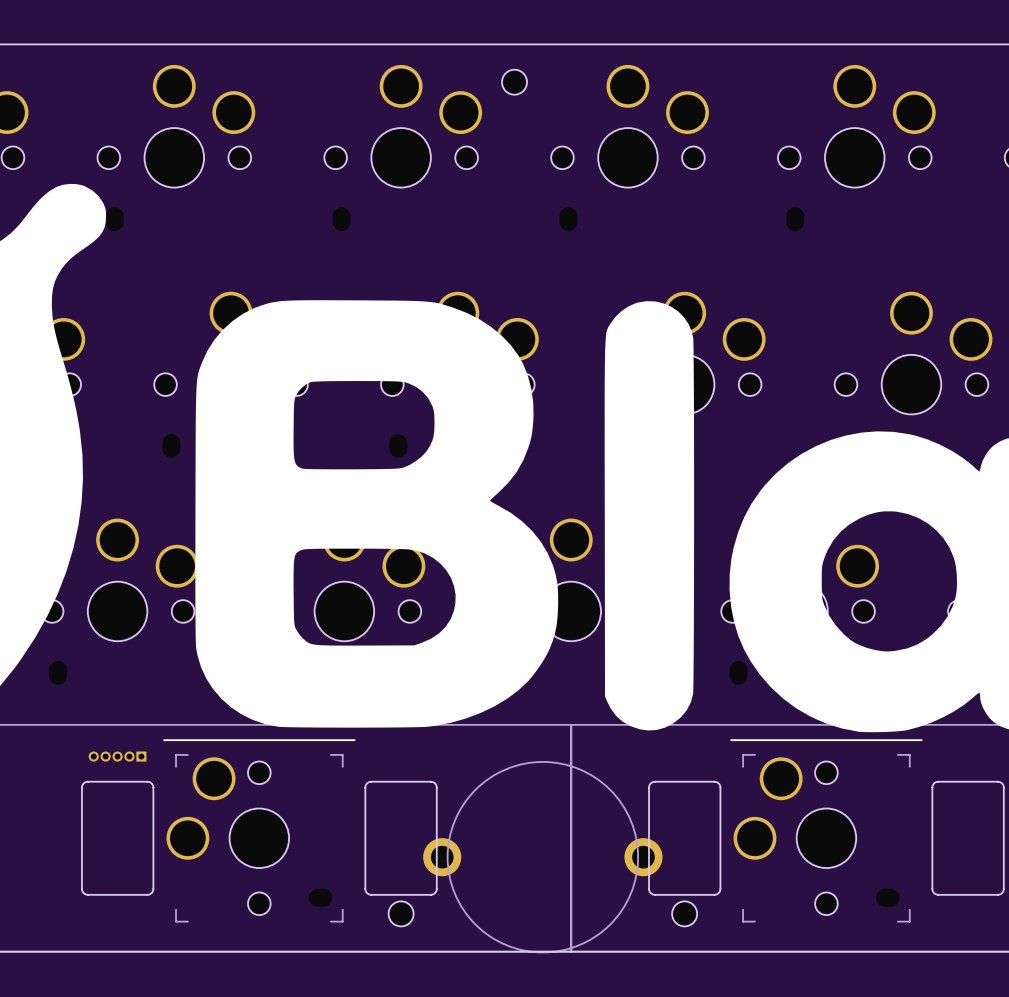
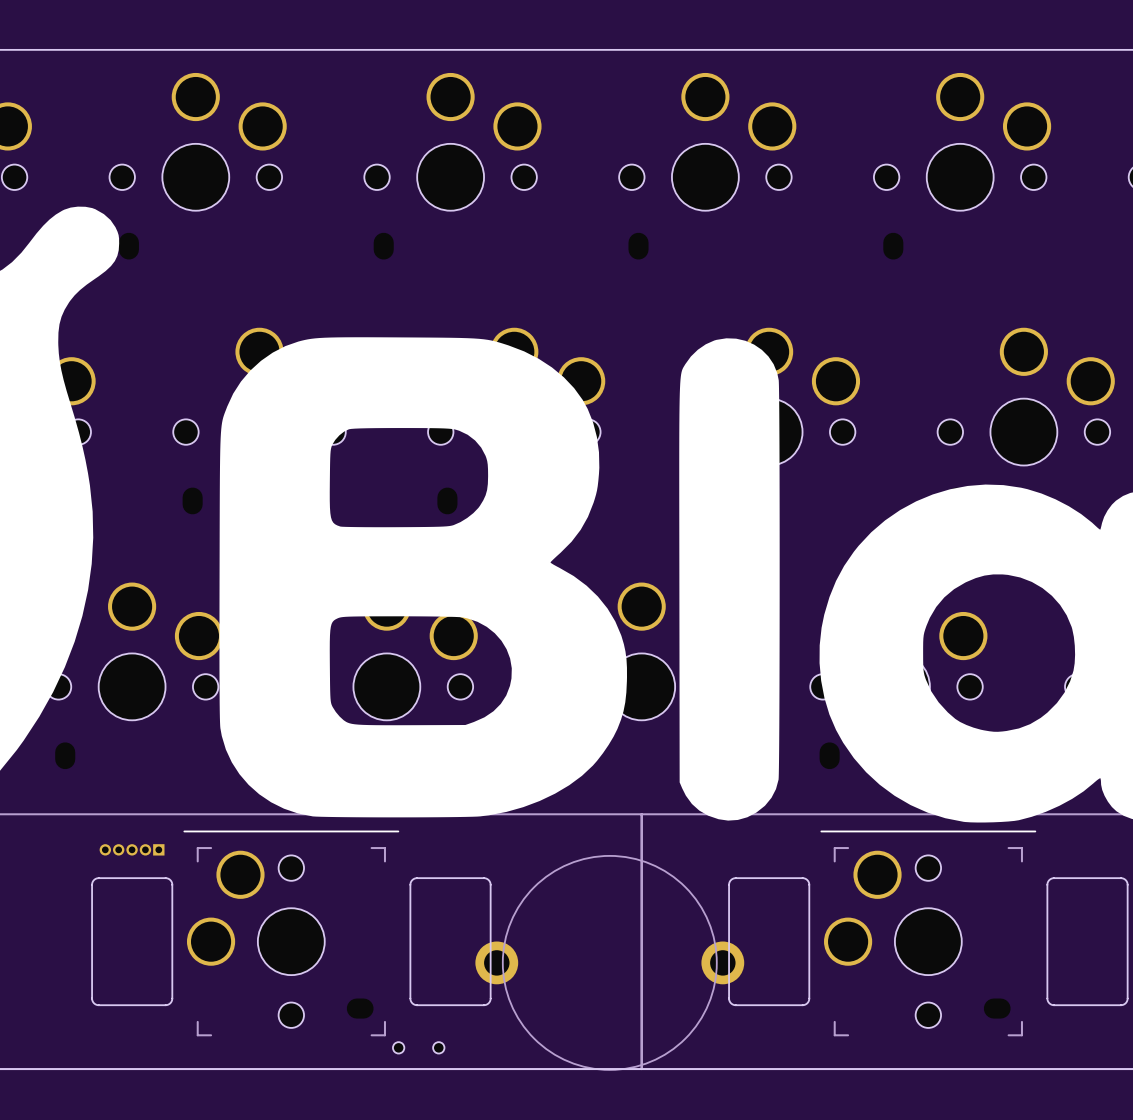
part: (514, 82) -> none
part: (401, 913) -> none
part: (684, 913) -> none
part: none -> (418, 1047)

